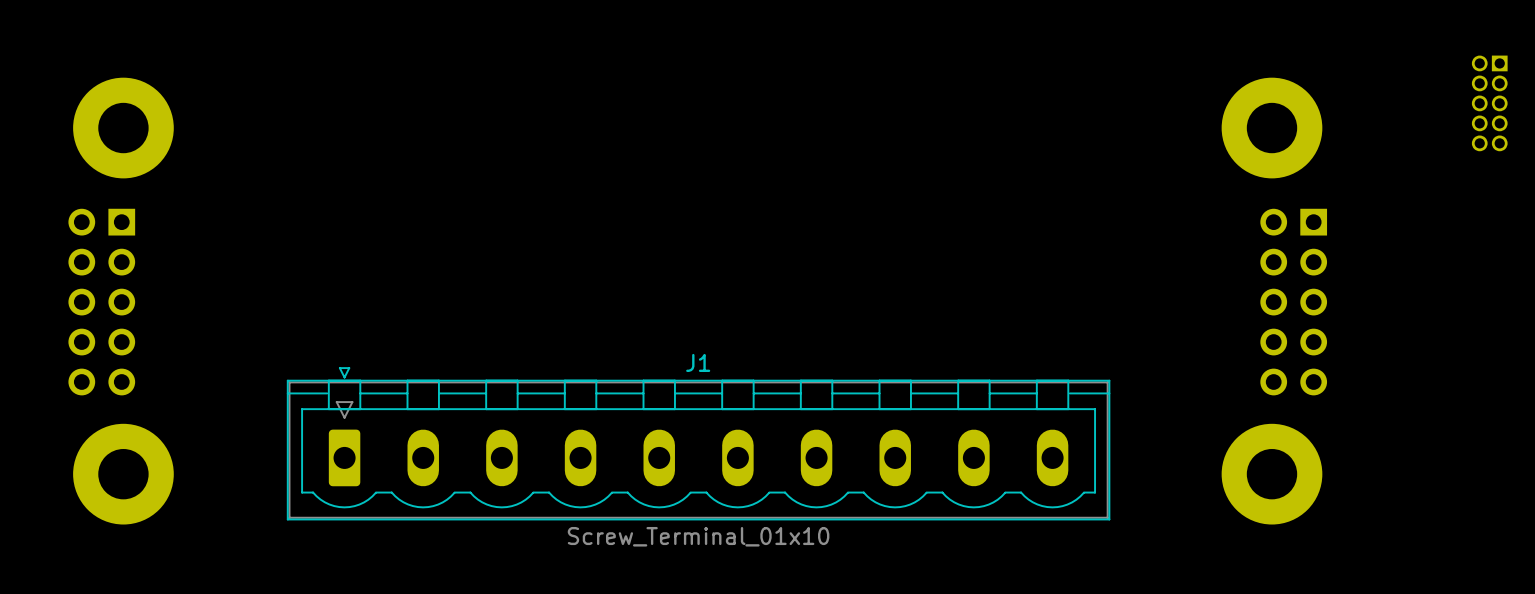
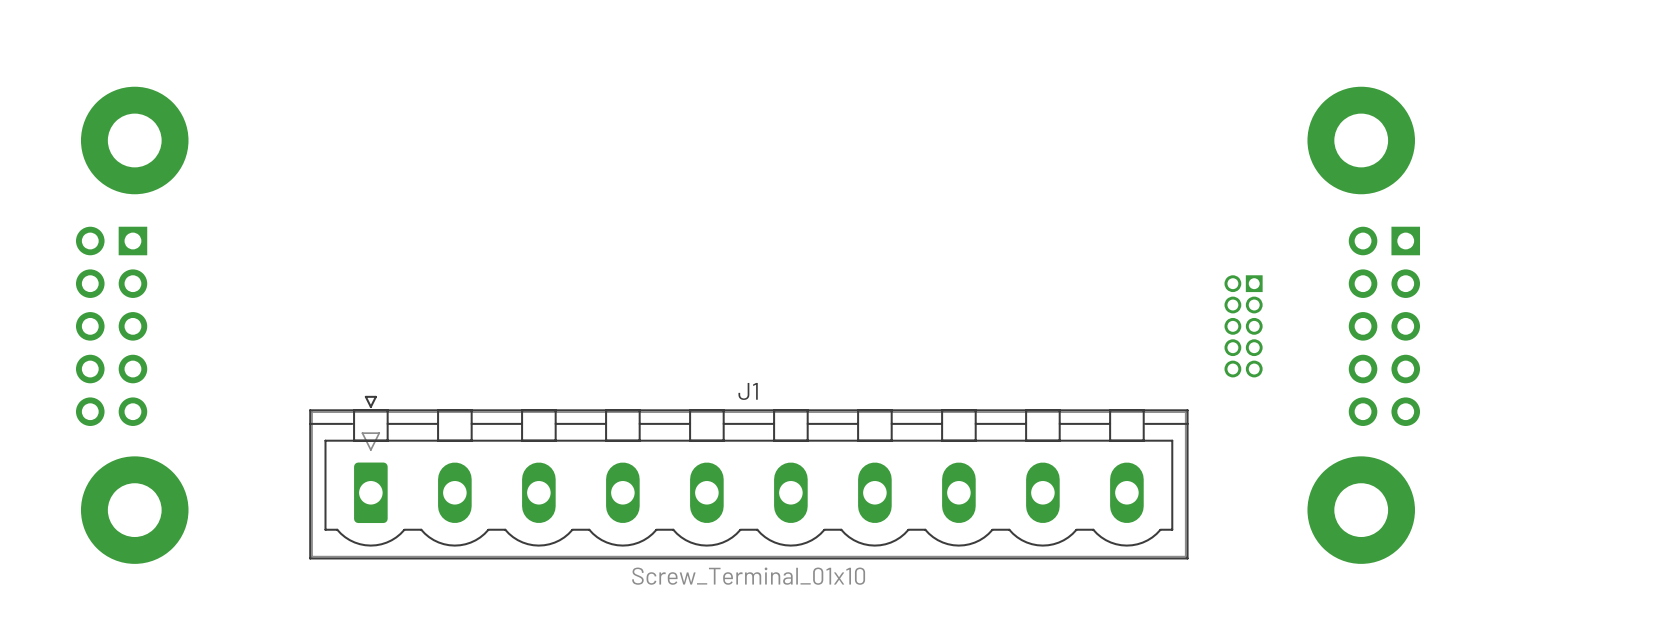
part position: (1489, 103) -> (1243, 326)

